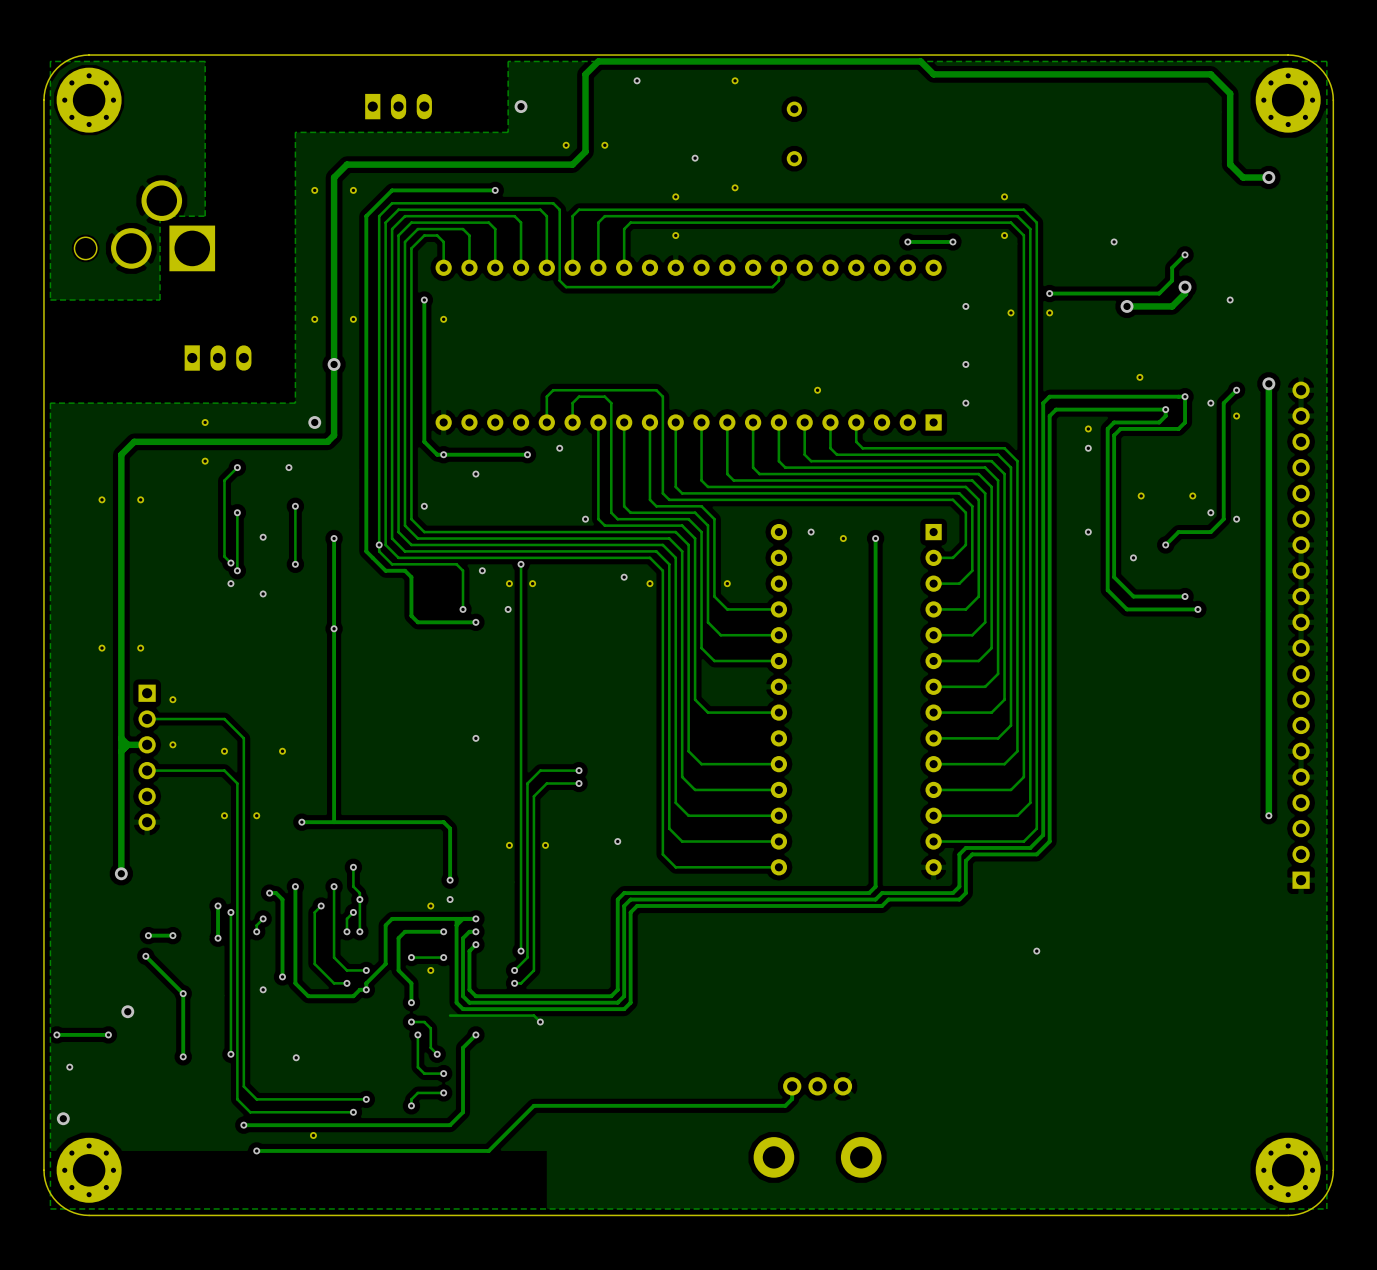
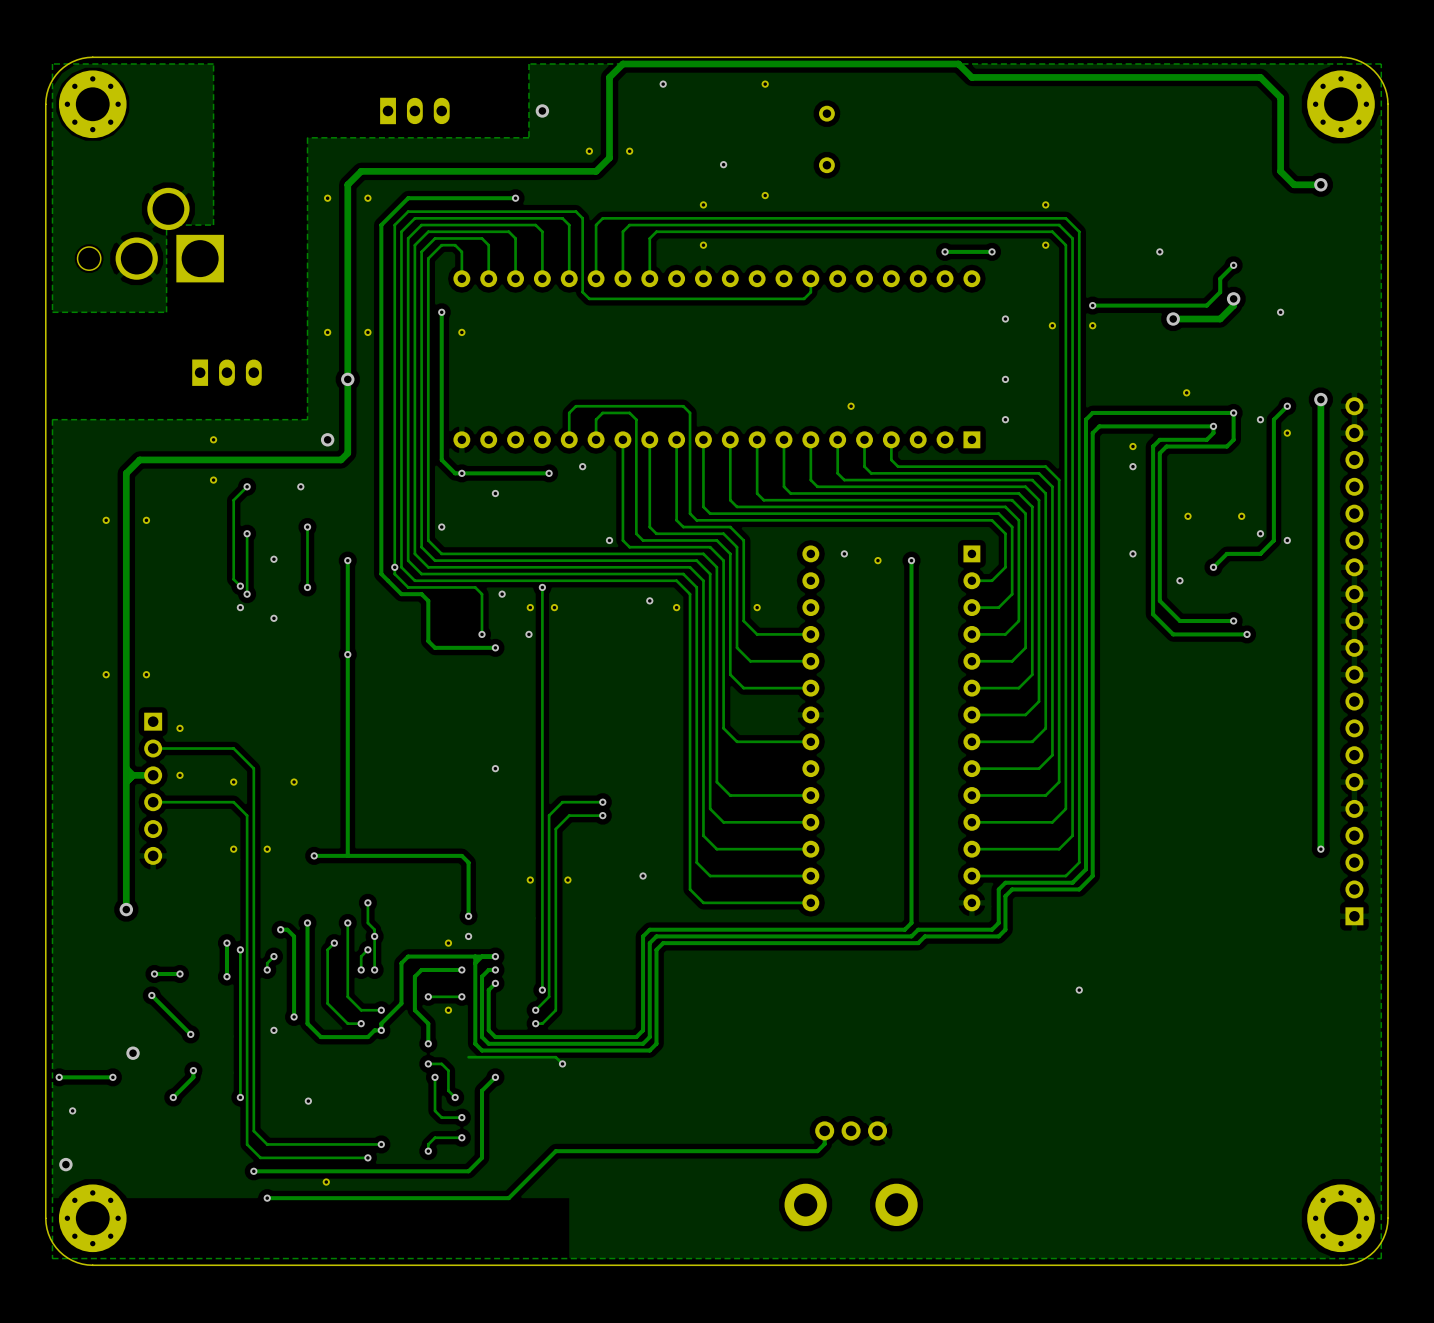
track: (183, 993) (183, 1056) -> none
track: none -> (193, 1070) (193, 1077) (173, 1097)
via: none -> (193, 1070)
via: none -> (173, 1097)
via: (183, 1056) -> none

